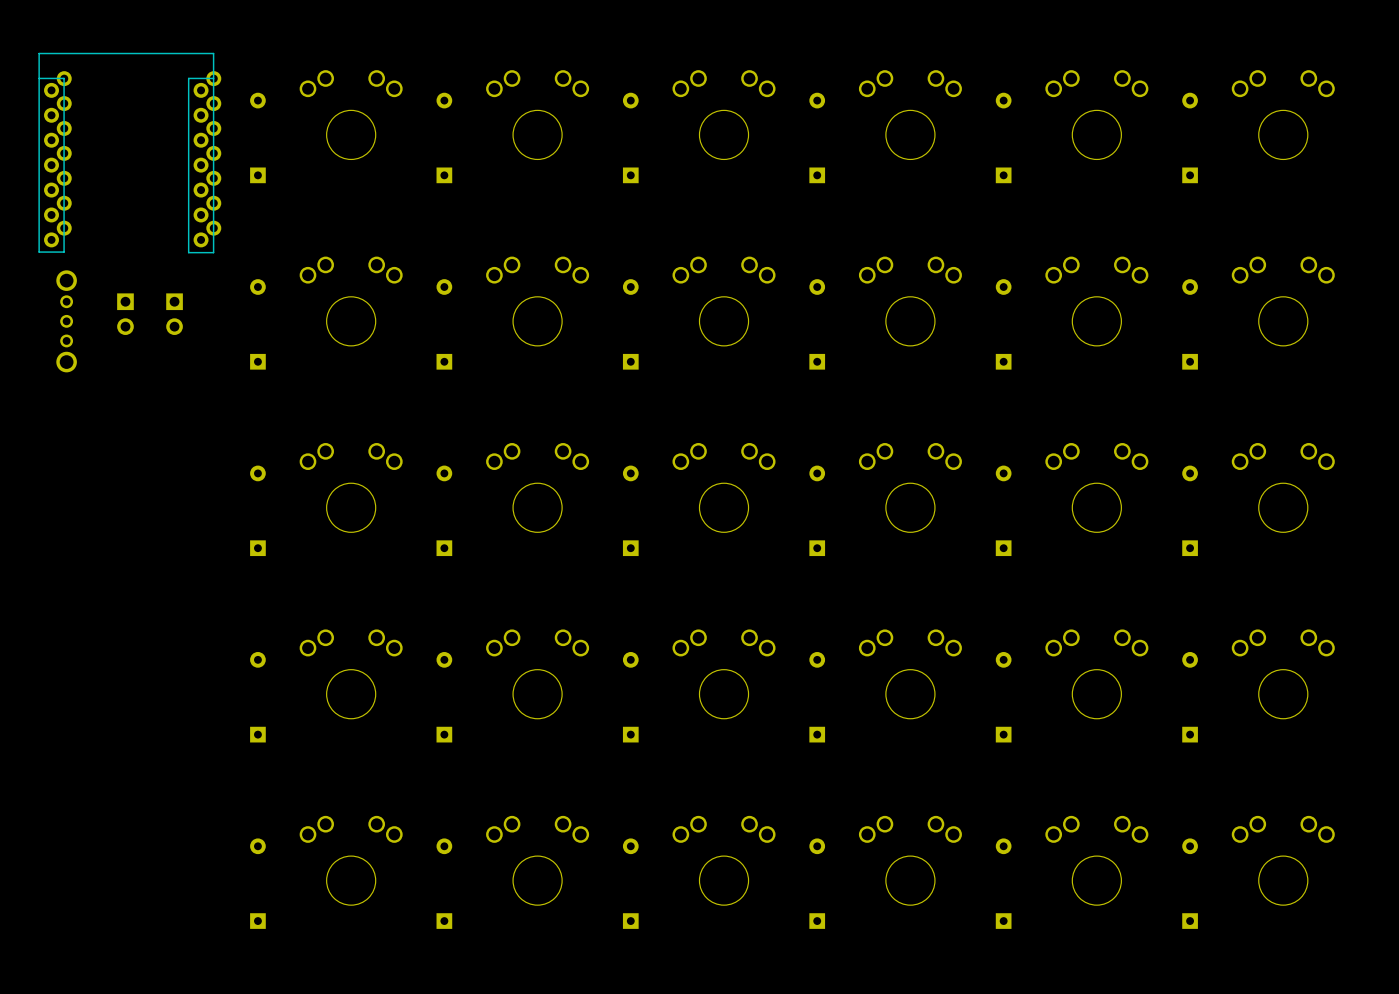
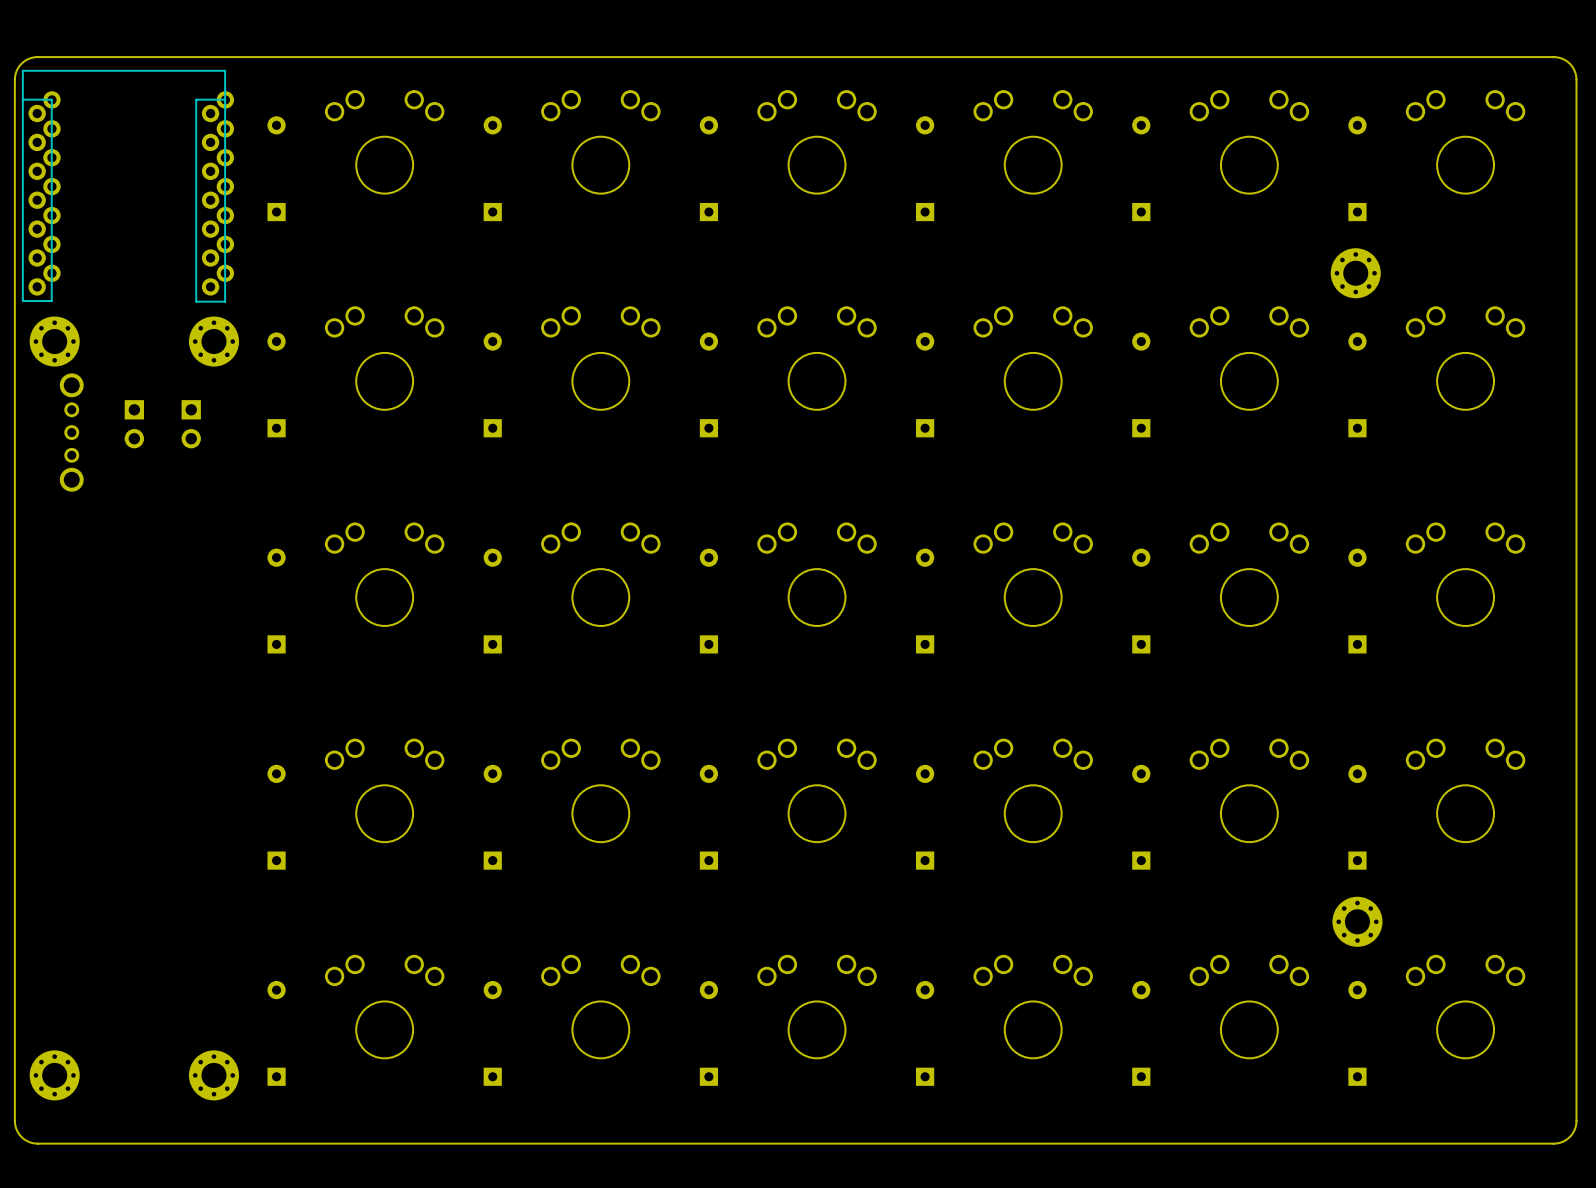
board edge: none -> (1553, 57) (37, 57) (25, 60) (18, 67) (14, 79) (14, 1120) (18, 1133) (25, 1140) (37, 1143) (1553, 1143) (1565, 1140) (1573, 1133) (1576, 1120) (1576, 79) (1575, 72) (1569, 63) (1563, 59) (1553, 57)
part: none -> (1355, 273)
part: none -> (54, 341)
part: none -> (213, 341)
part: (125, 314) -> none
part: (174, 314) -> none
part position: (66, 321) -> (71, 432)
part: none -> (134, 424)
part: none -> (191, 424)
part: none -> (1357, 921)
part: none -> (54, 1075)
part: none -> (213, 1075)

